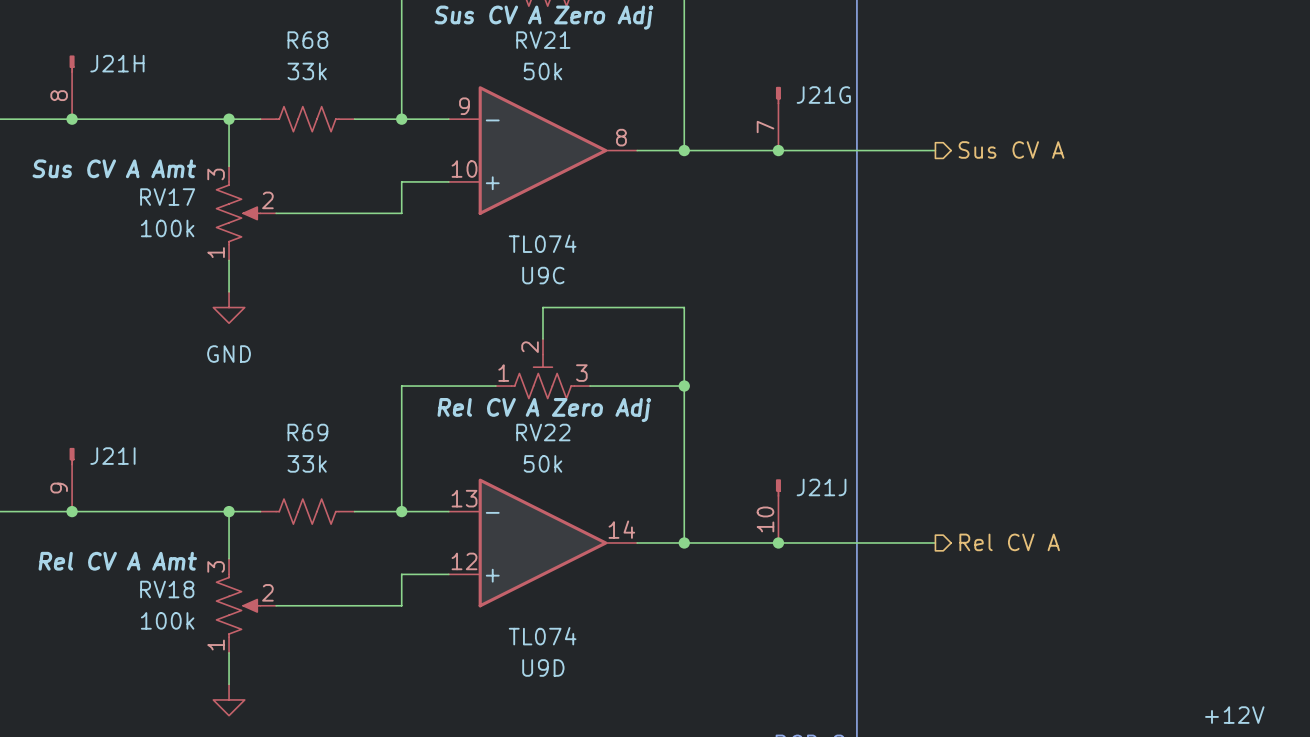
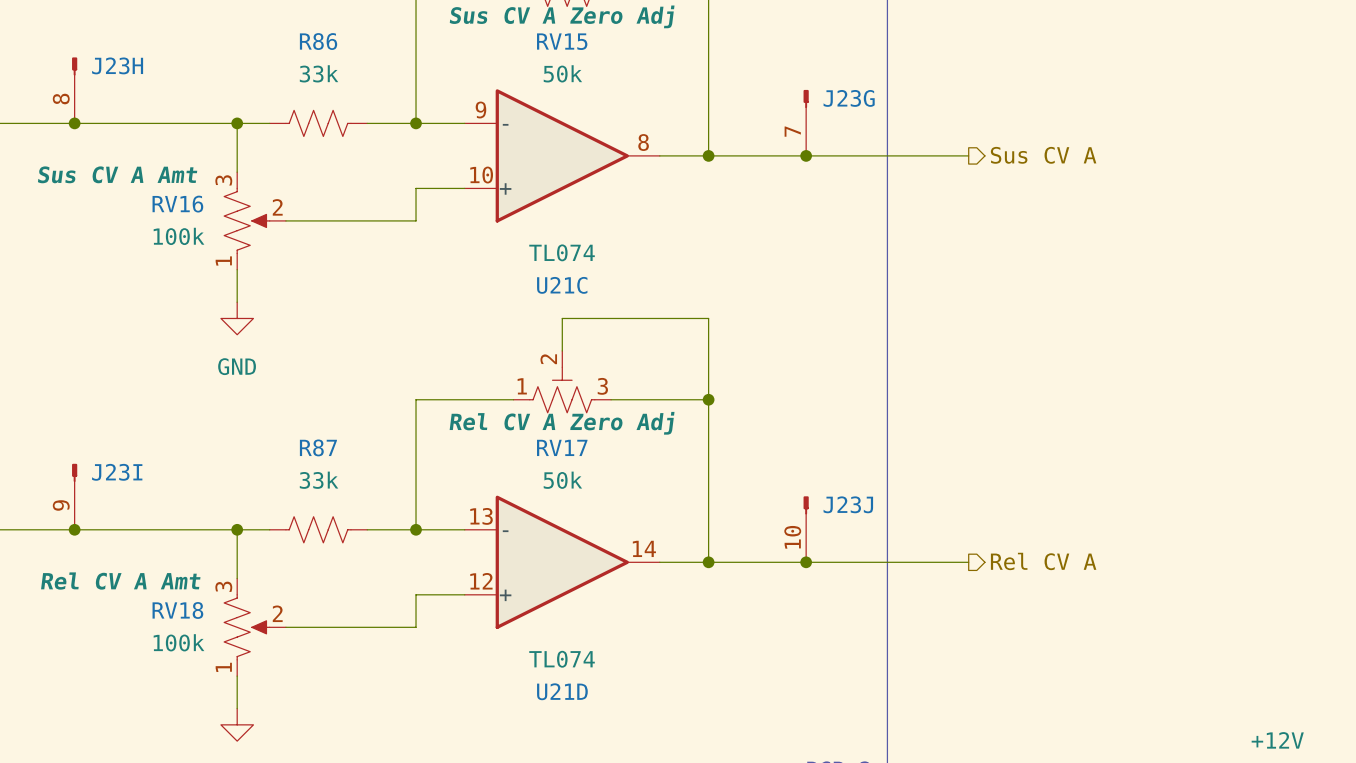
R68 name: R68 (307, 40) -> R86 (318, 41)
RV21 name: RV21 (543, 40) -> RV15 (562, 41)
J21H name: J21H (117, 63) -> J23H (117, 65)
J21G name: J21G (823, 95) -> J23G (849, 98)
RV17 name: RV17 (167, 197) -> RV16 (177, 204)
U9C name: U9C (543, 275) -> U21C (562, 285)
R69 name: R69 (307, 432) -> R87 (318, 447)
RV22 name: RV22 (543, 432) -> RV17 (562, 447)
J21I name: J21I (112, 456) -> J23I (117, 472)
J21J name: J21J (821, 487) -> J23J (848, 504)
U9D name: U9D (543, 667) -> U21D (562, 691)

